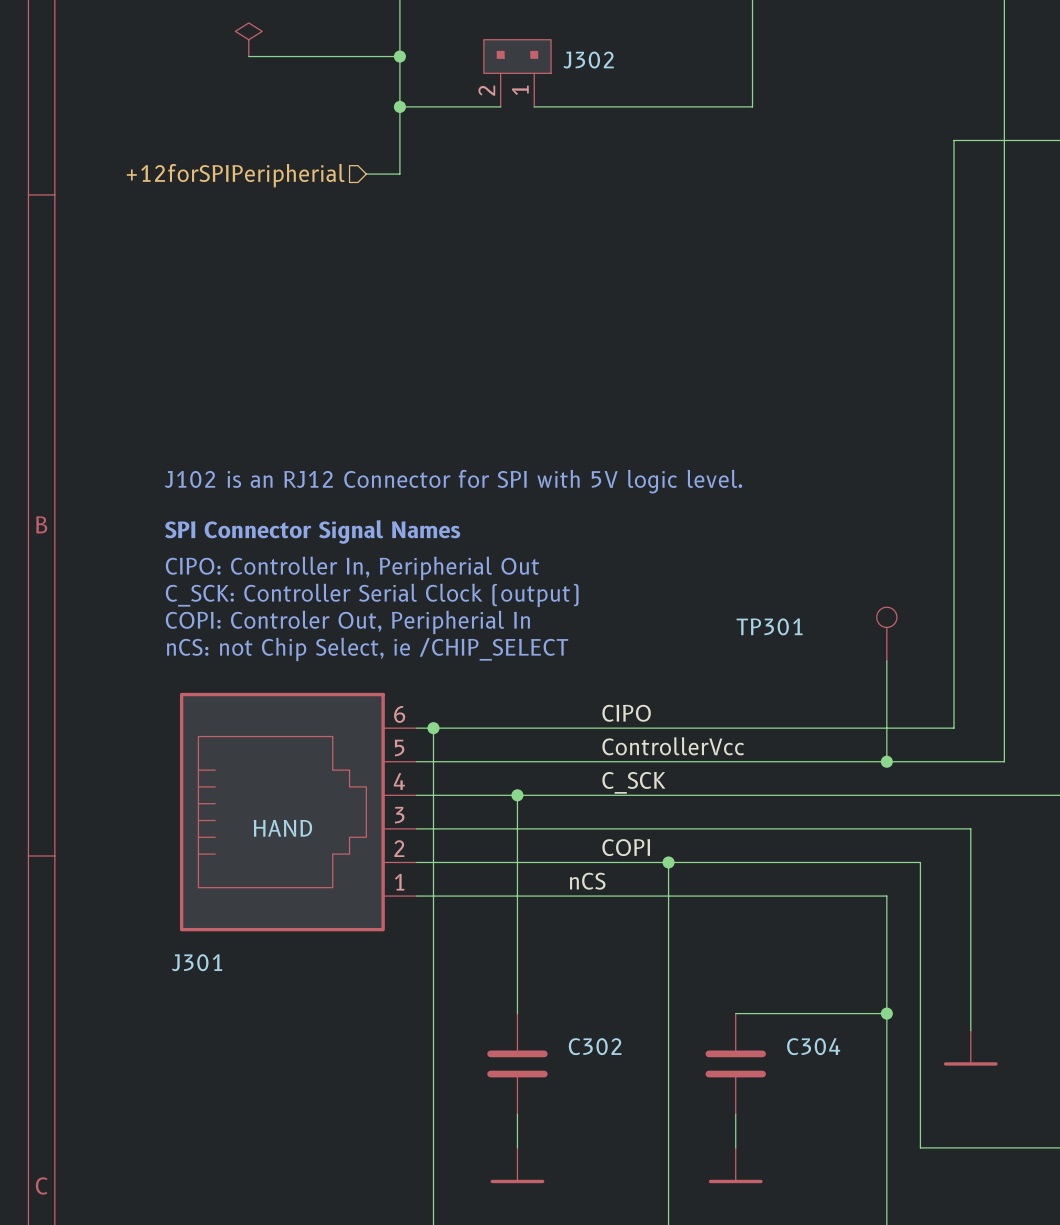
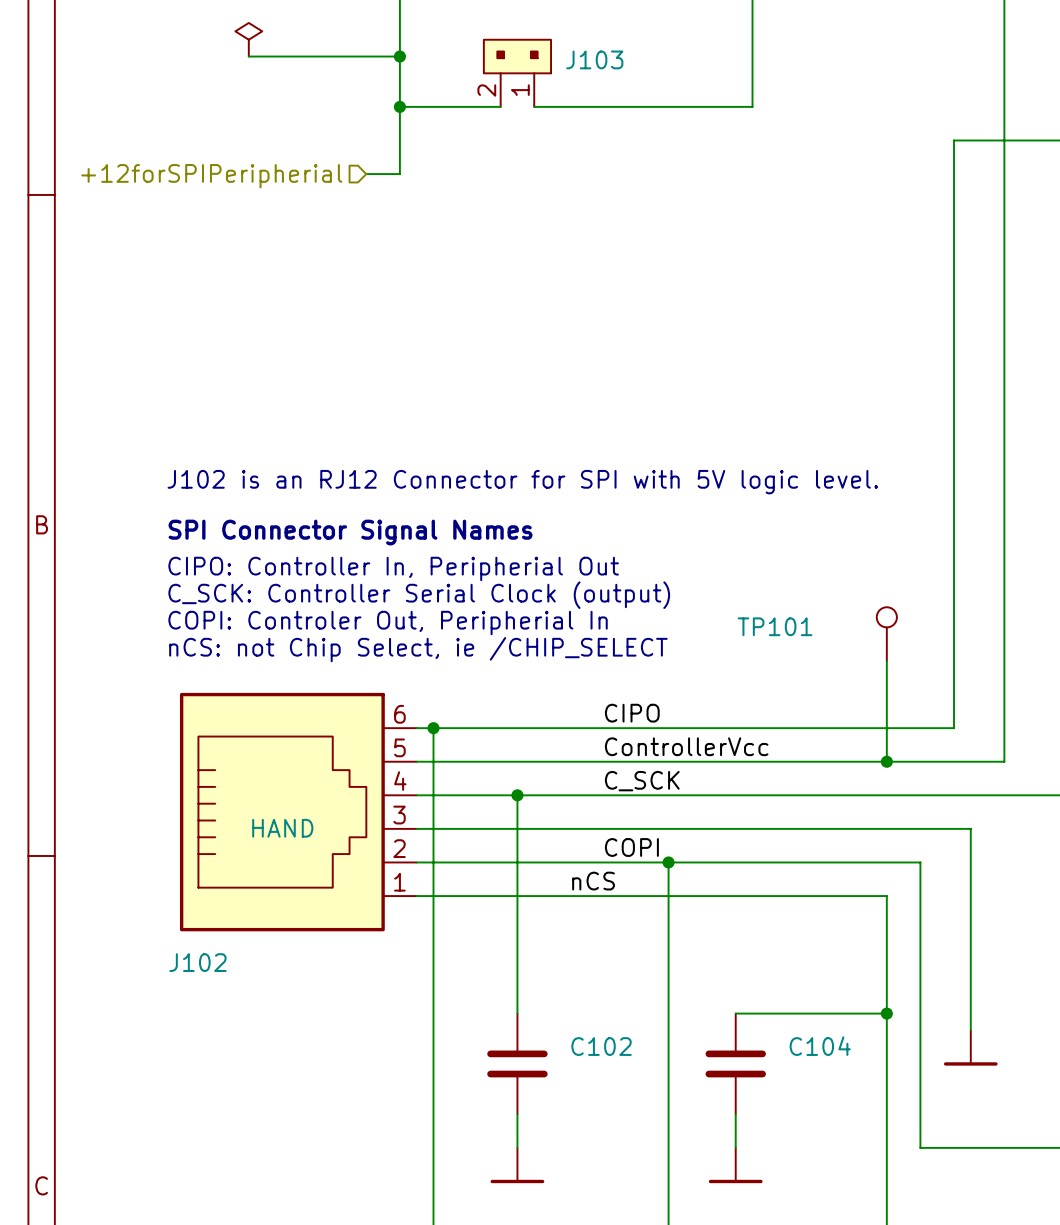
J302 name: J302 (588, 60) -> J103 (594, 59)
TP301 name: TP301 (769, 626) -> TP101 (775, 626)
J301 name: J301 (197, 962) -> J102 (198, 962)
C302 name: C302 (595, 1046) -> C102 (601, 1046)
C304 name: C304 (813, 1046) -> C104 (820, 1046)

